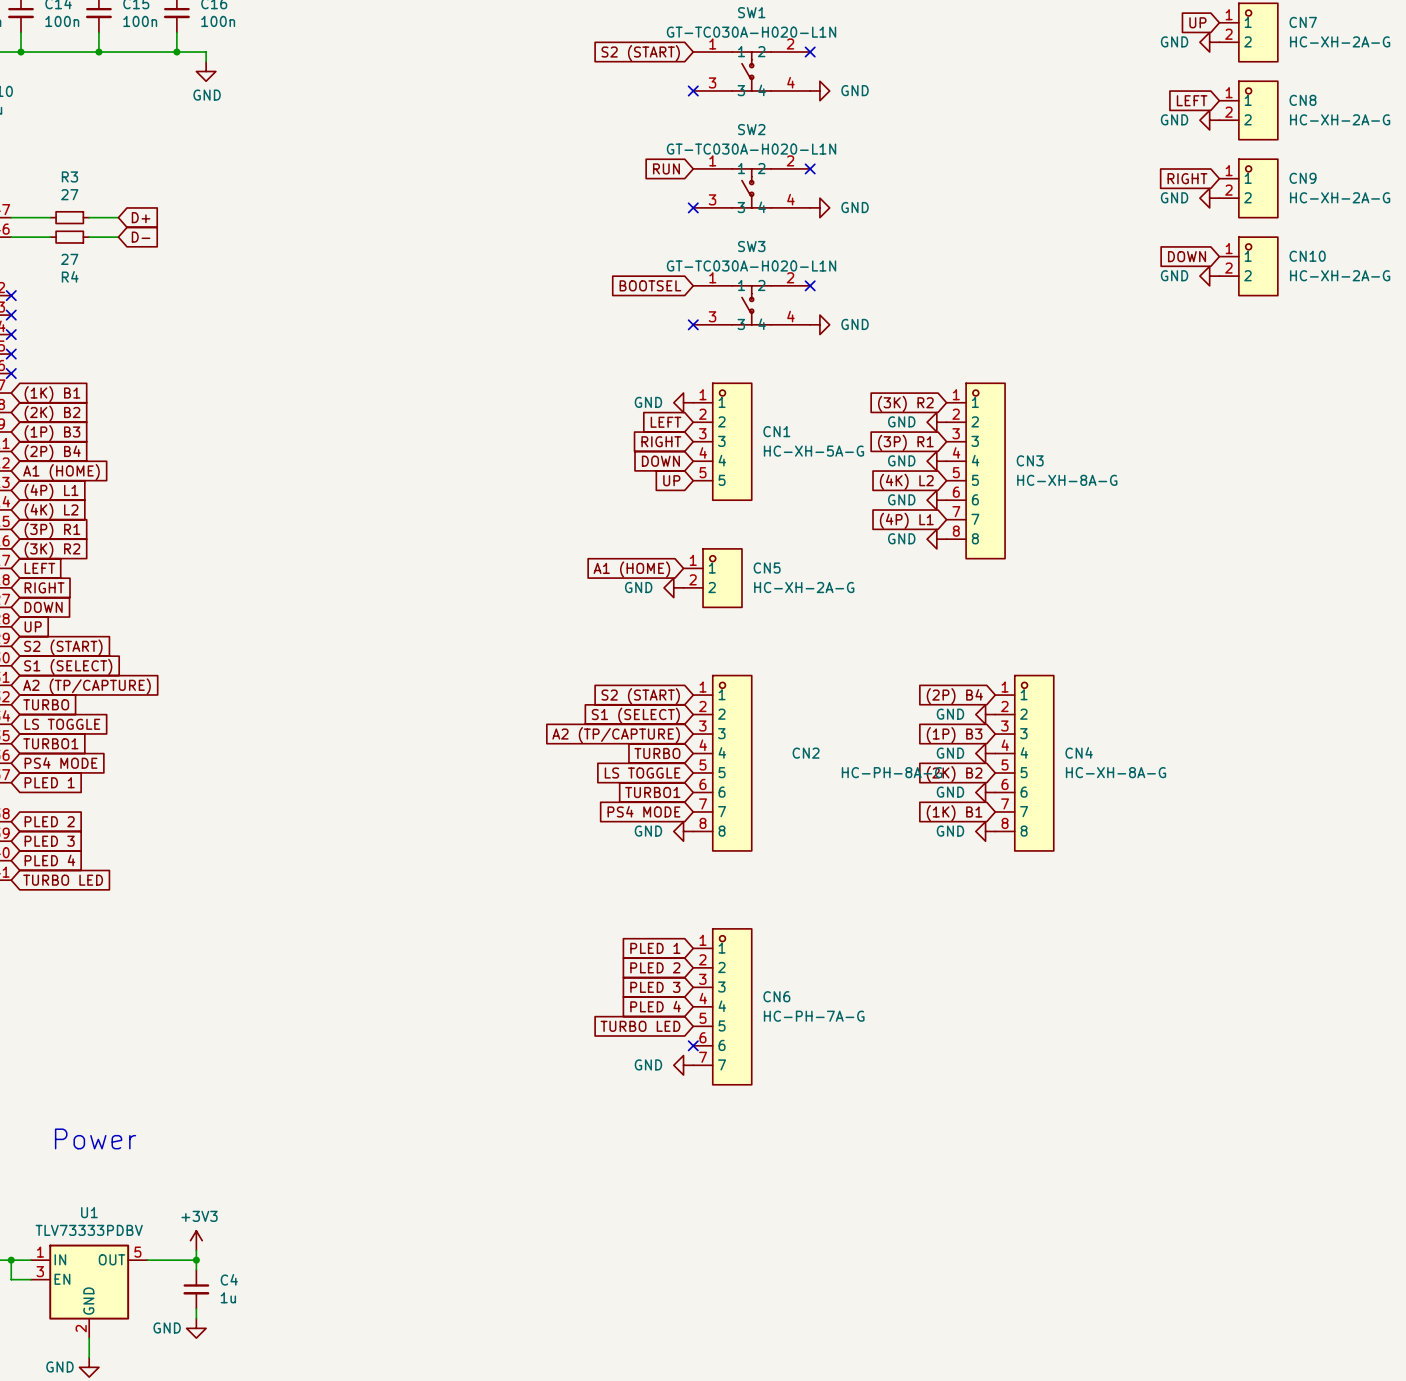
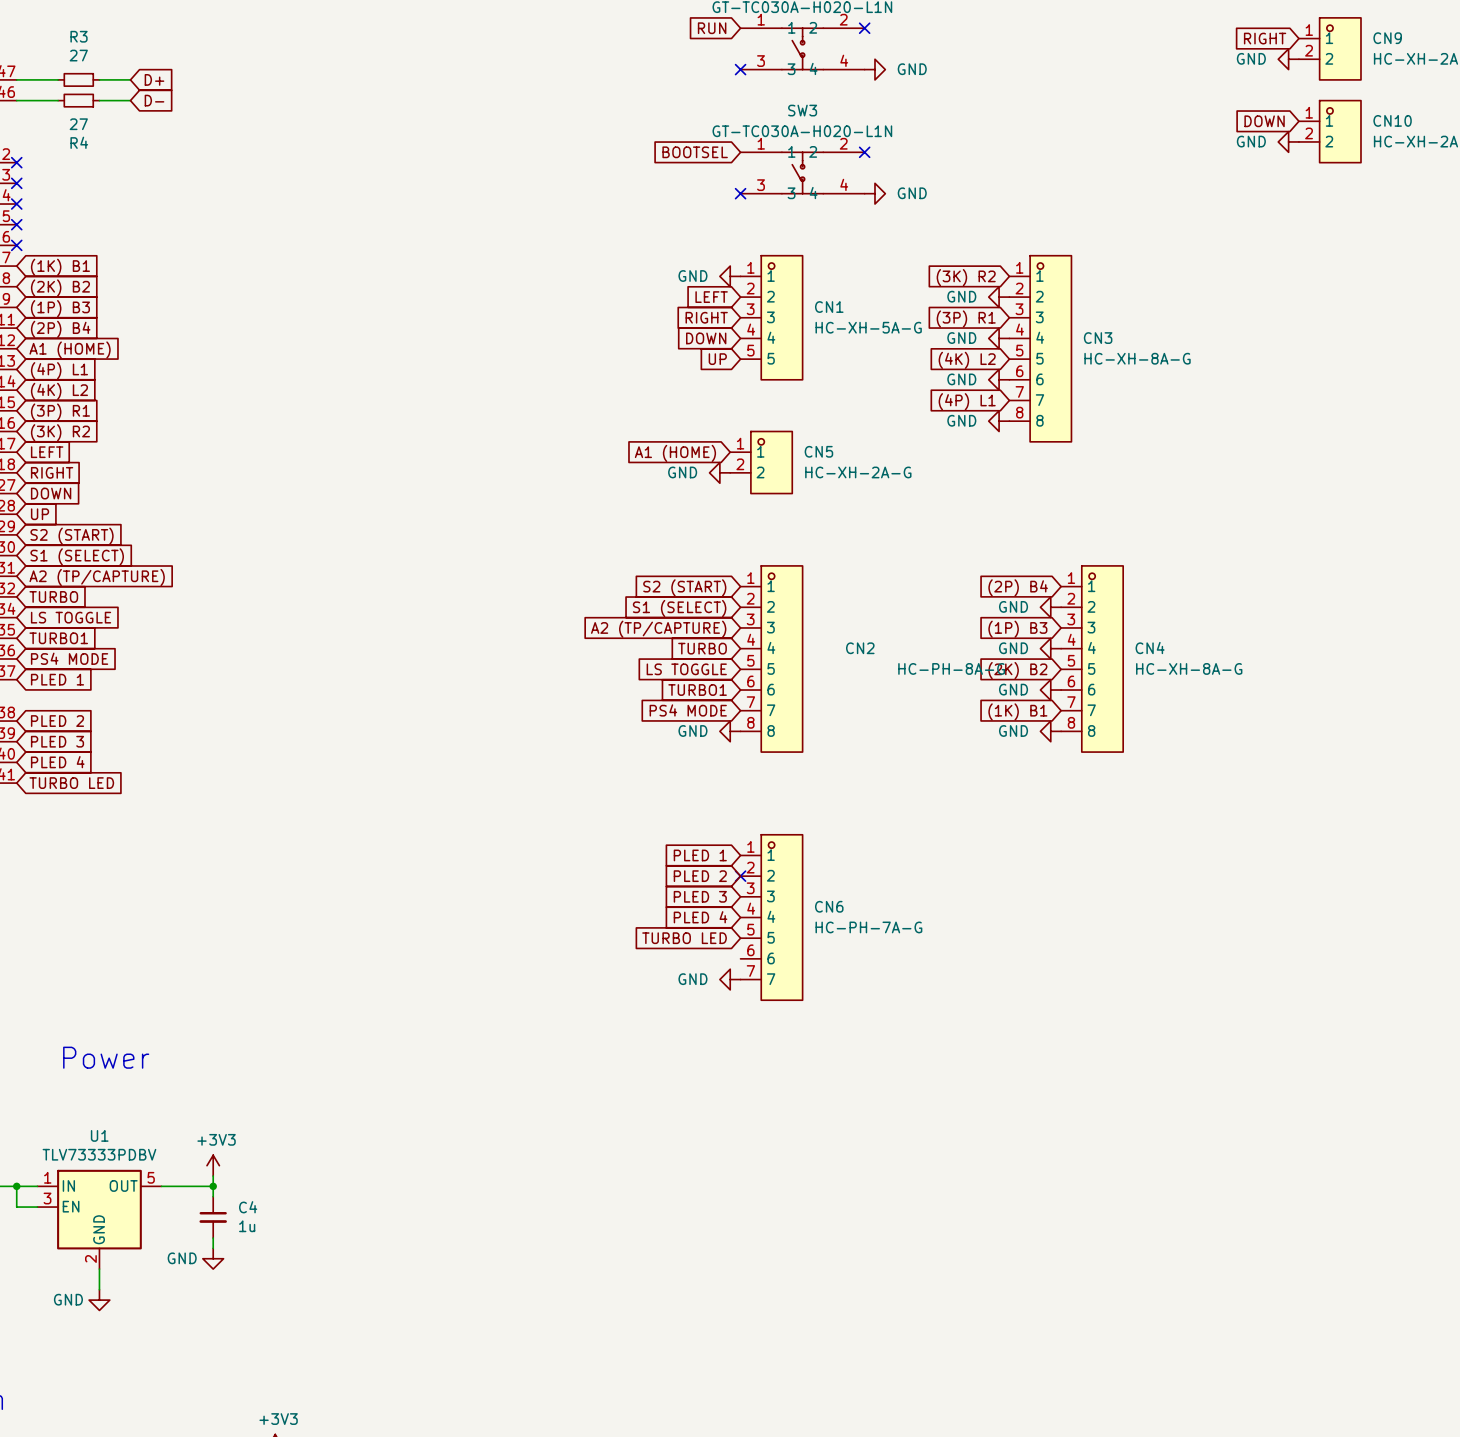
no-connect mark: none -> (740, 876)
no-connect mark: (693, 1045) -> none

